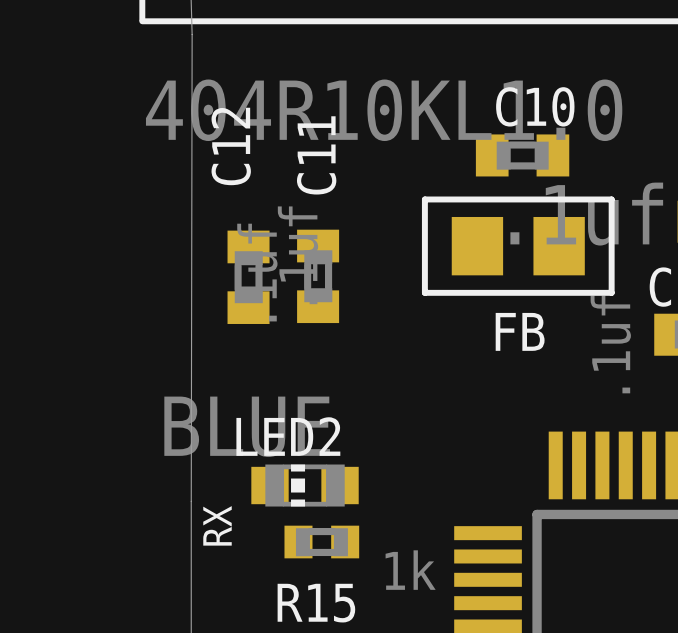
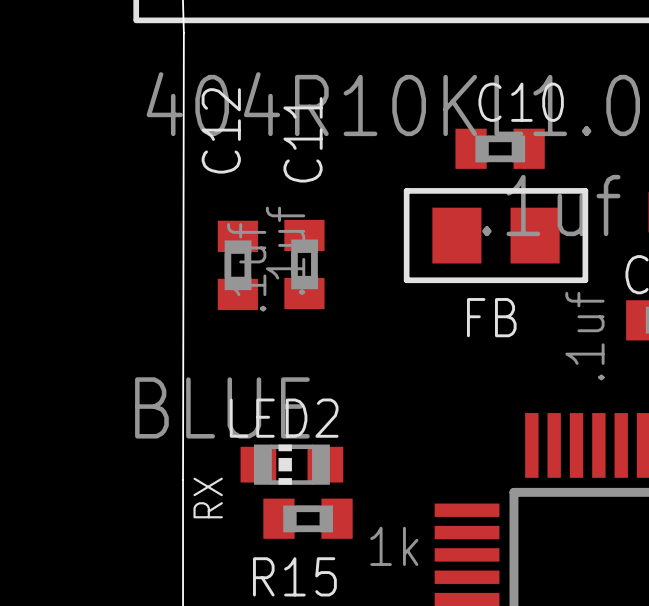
R15 footprint: [284, 525, 360, 559] -> [263, 498, 353, 539]

